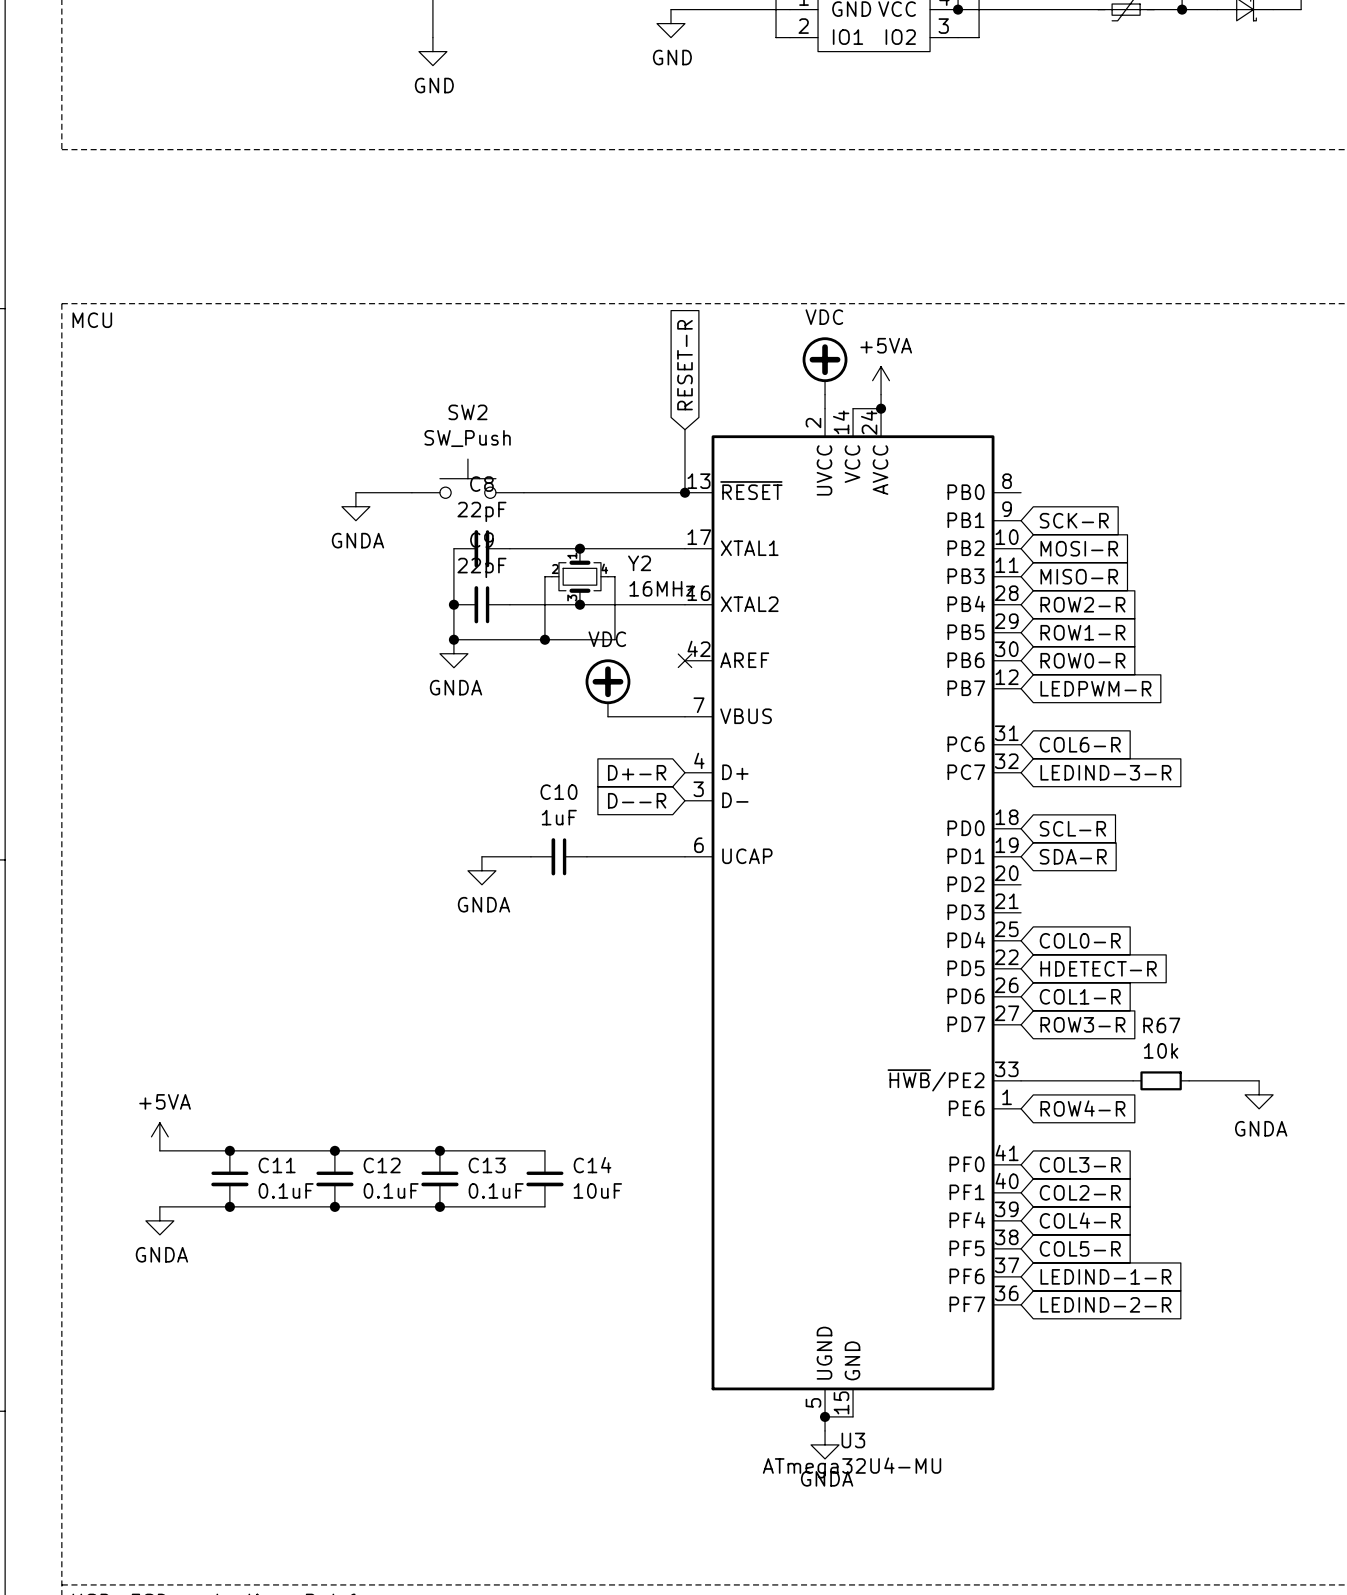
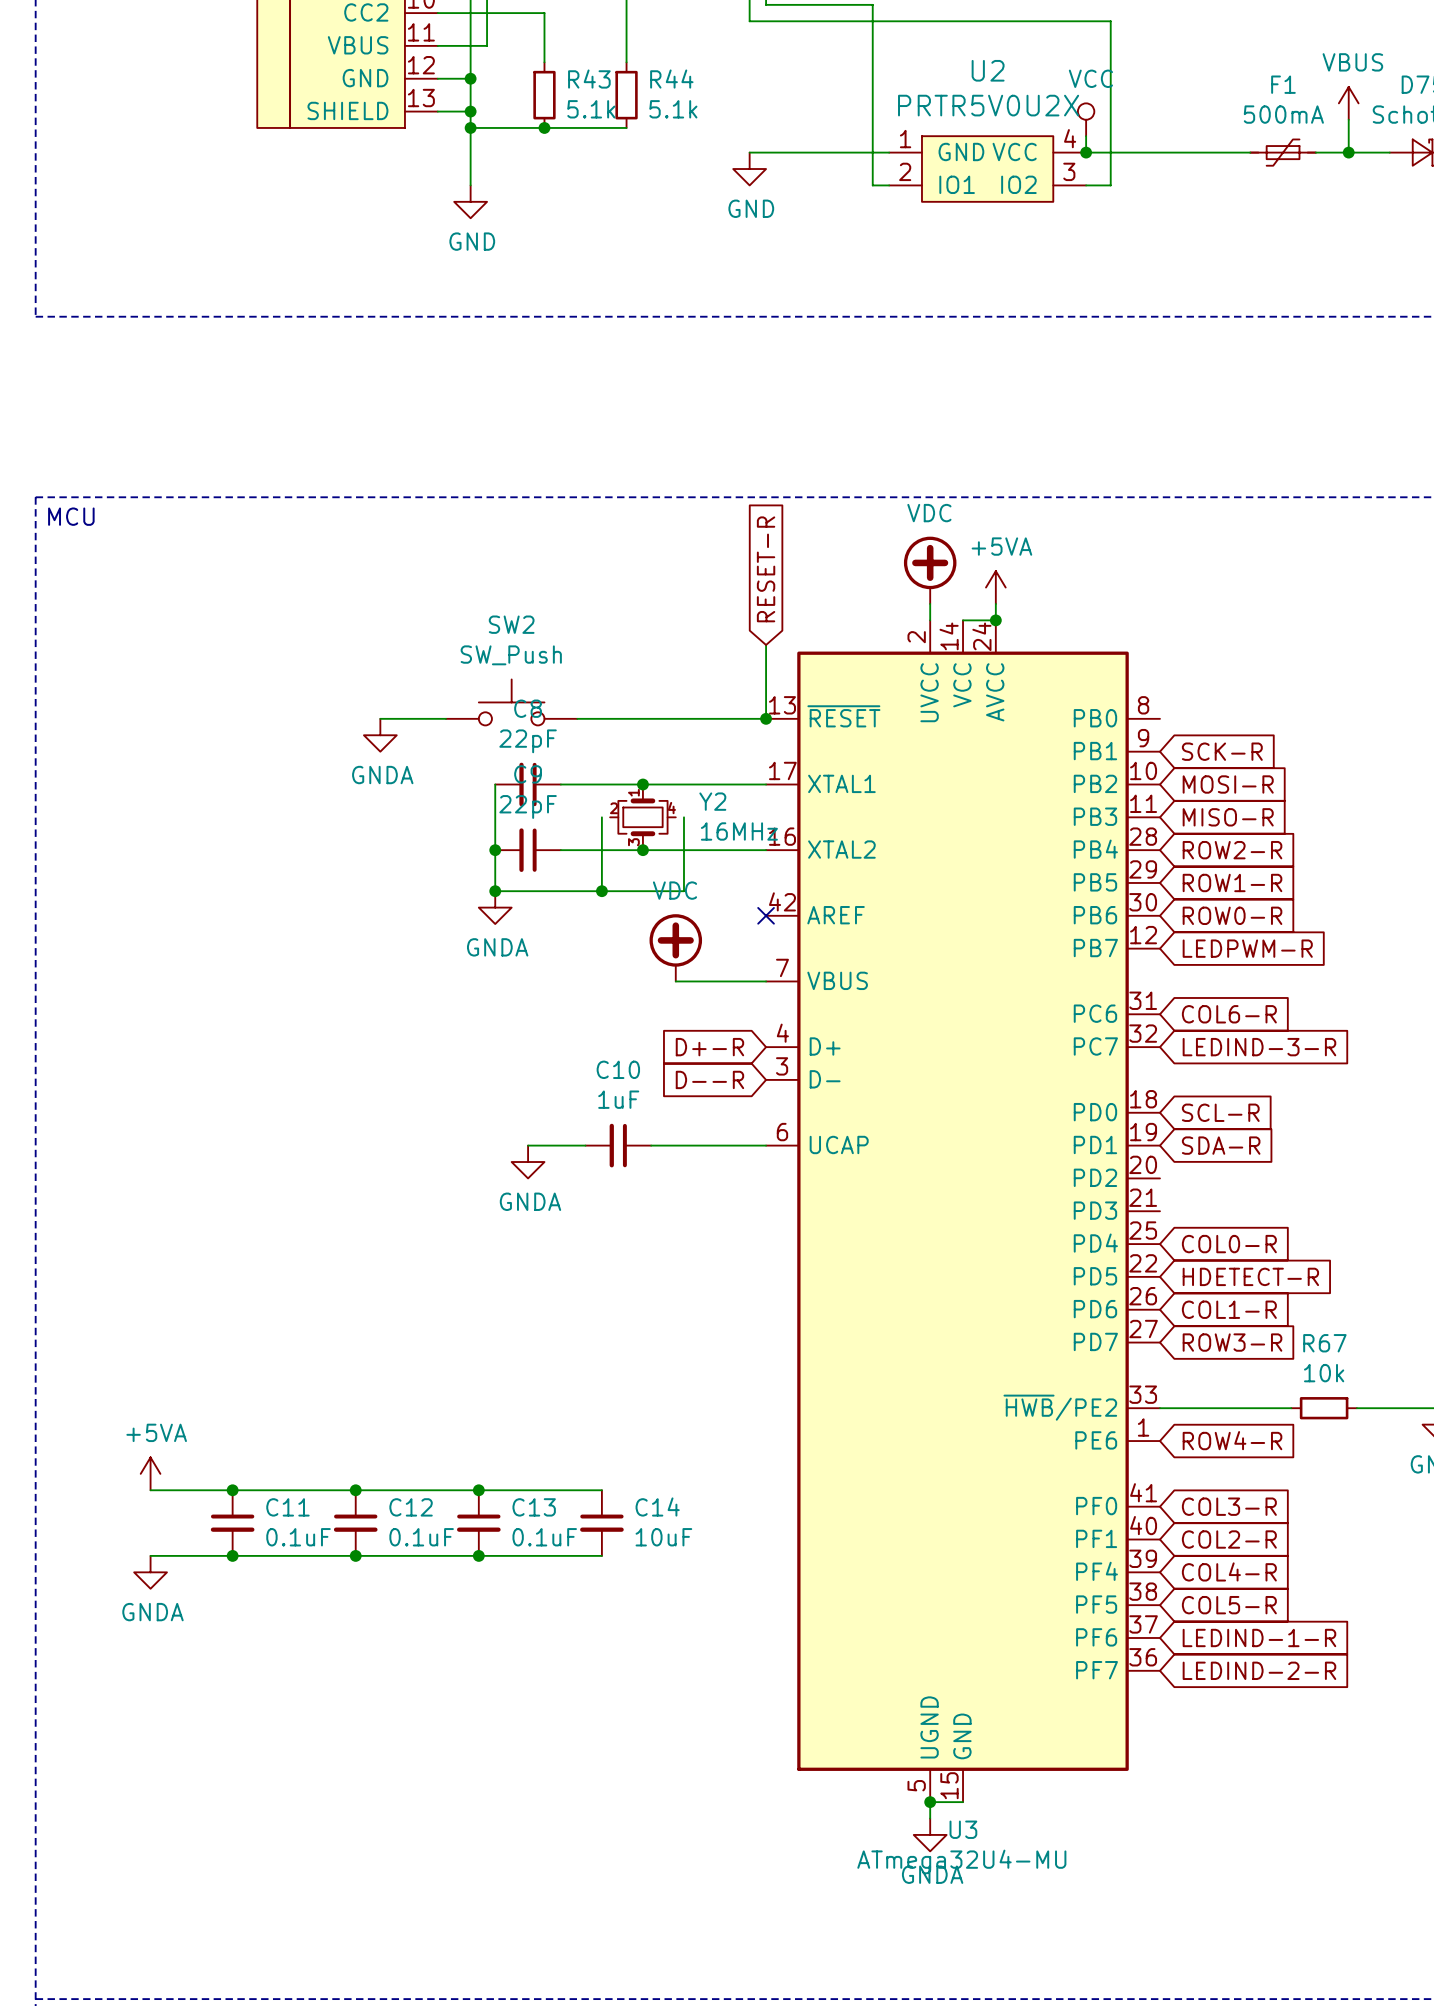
wire: (544, 576) (551, 576) -> none
wire: (607, 576) (614, 576) -> none

